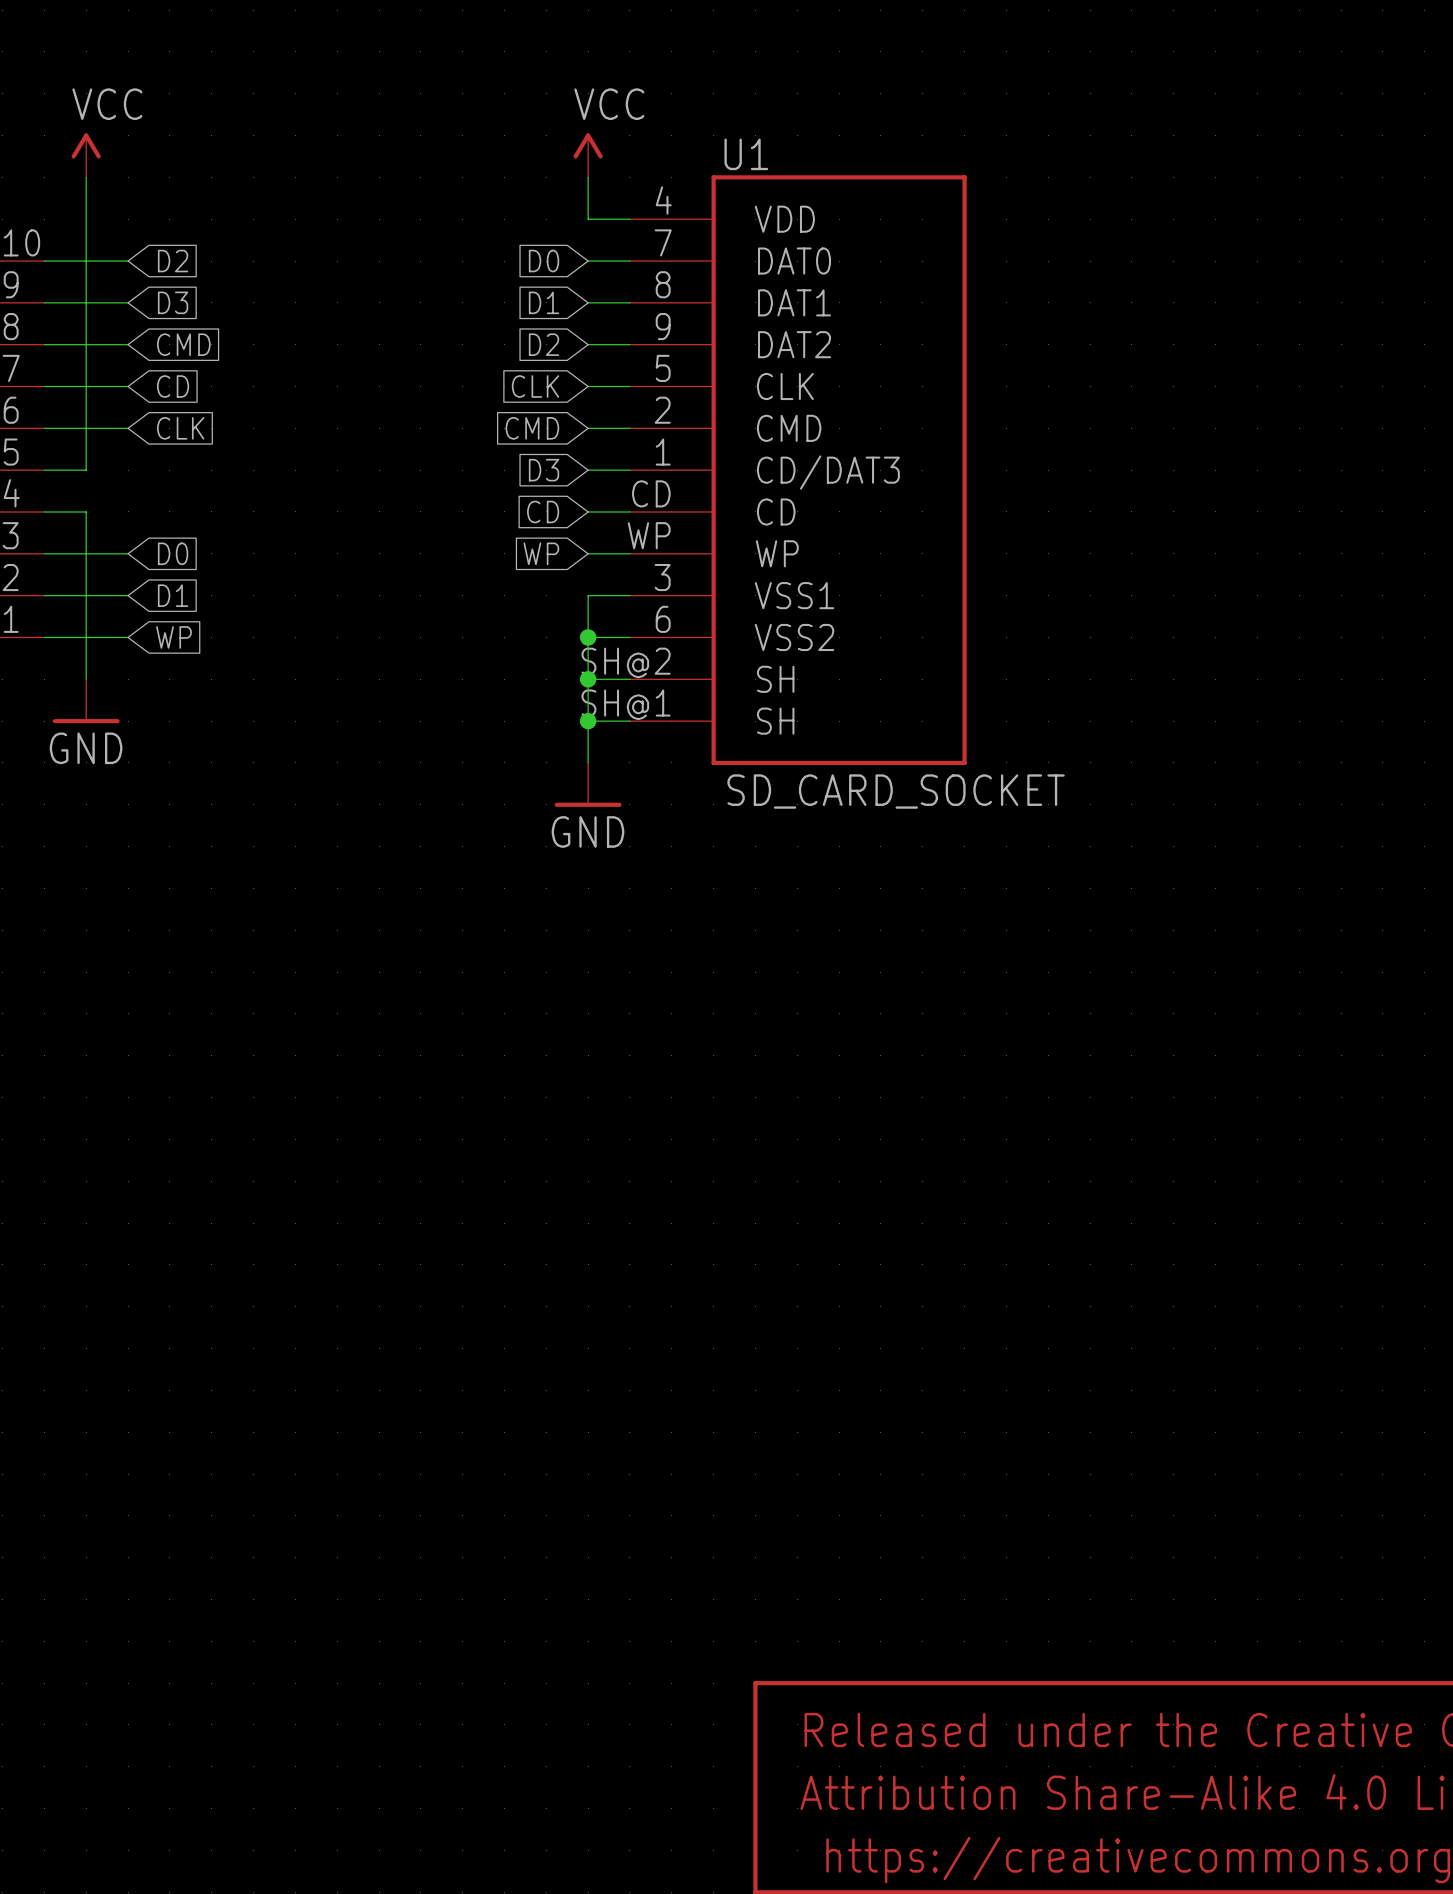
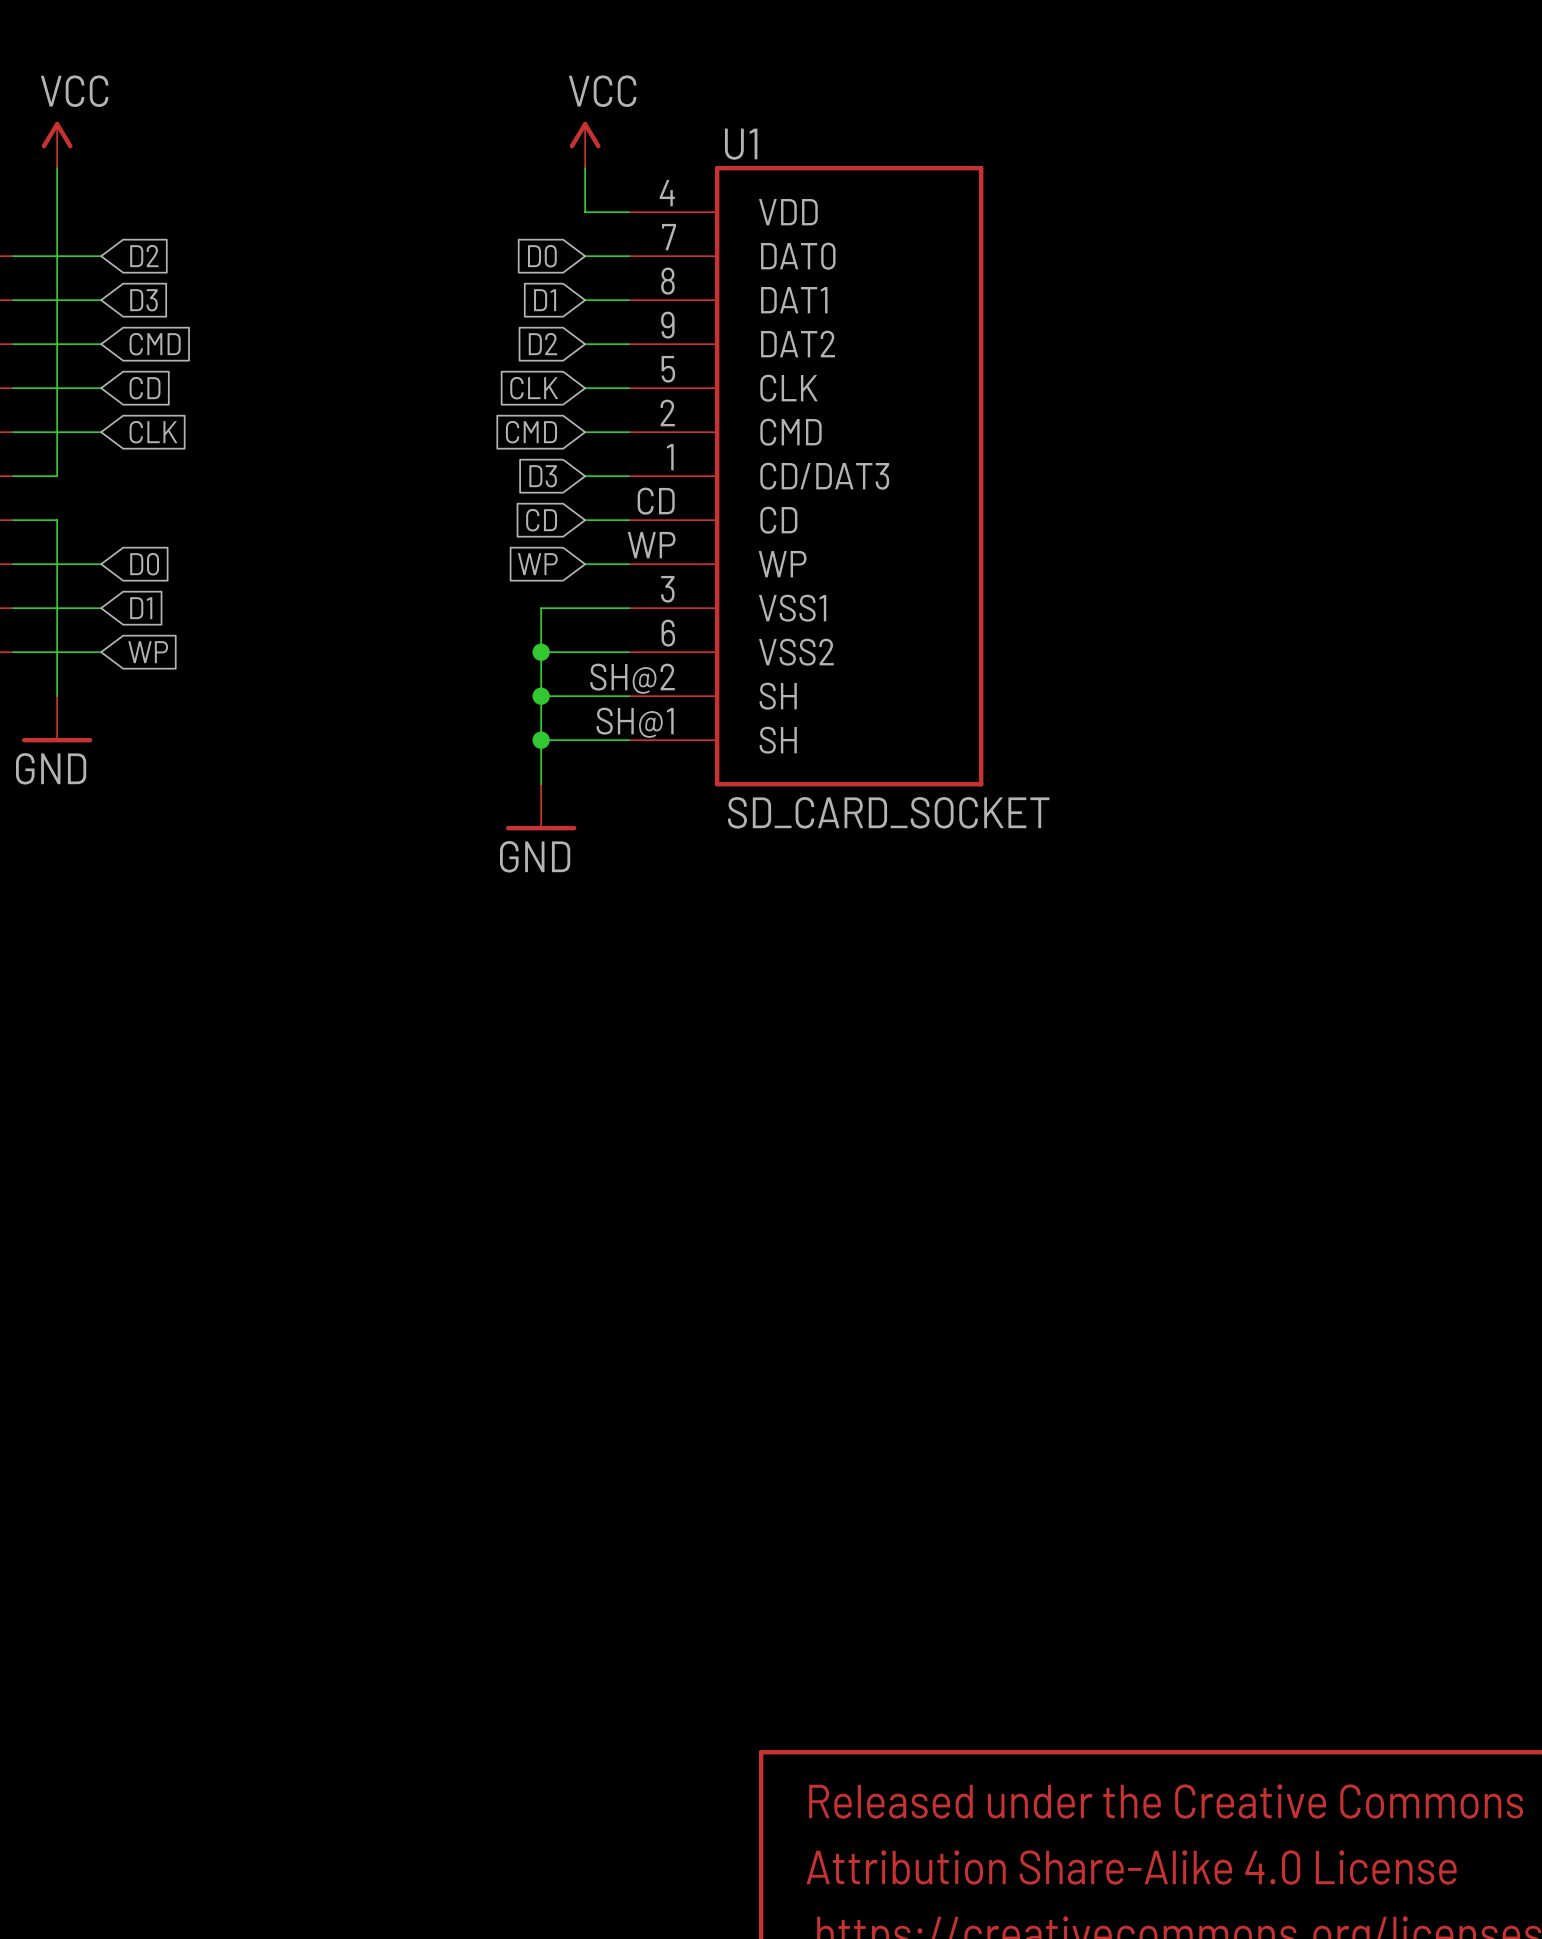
wire: (588, 595) (588, 762) -> (585, 608) (541, 608) (541, 784)
wire: none -> (541, 652) (585, 652)
junction: none -> (541, 652)
junction: (588, 637) -> none
wire: none -> (541, 696) (585, 696)
junction: none -> (541, 696)
junction: (588, 679) -> none
wire: none -> (541, 740) (585, 740)
junction: none -> (541, 740)
junction: (588, 721) -> none
power symbol position: GND (588, 784) -> GND (541, 807)

